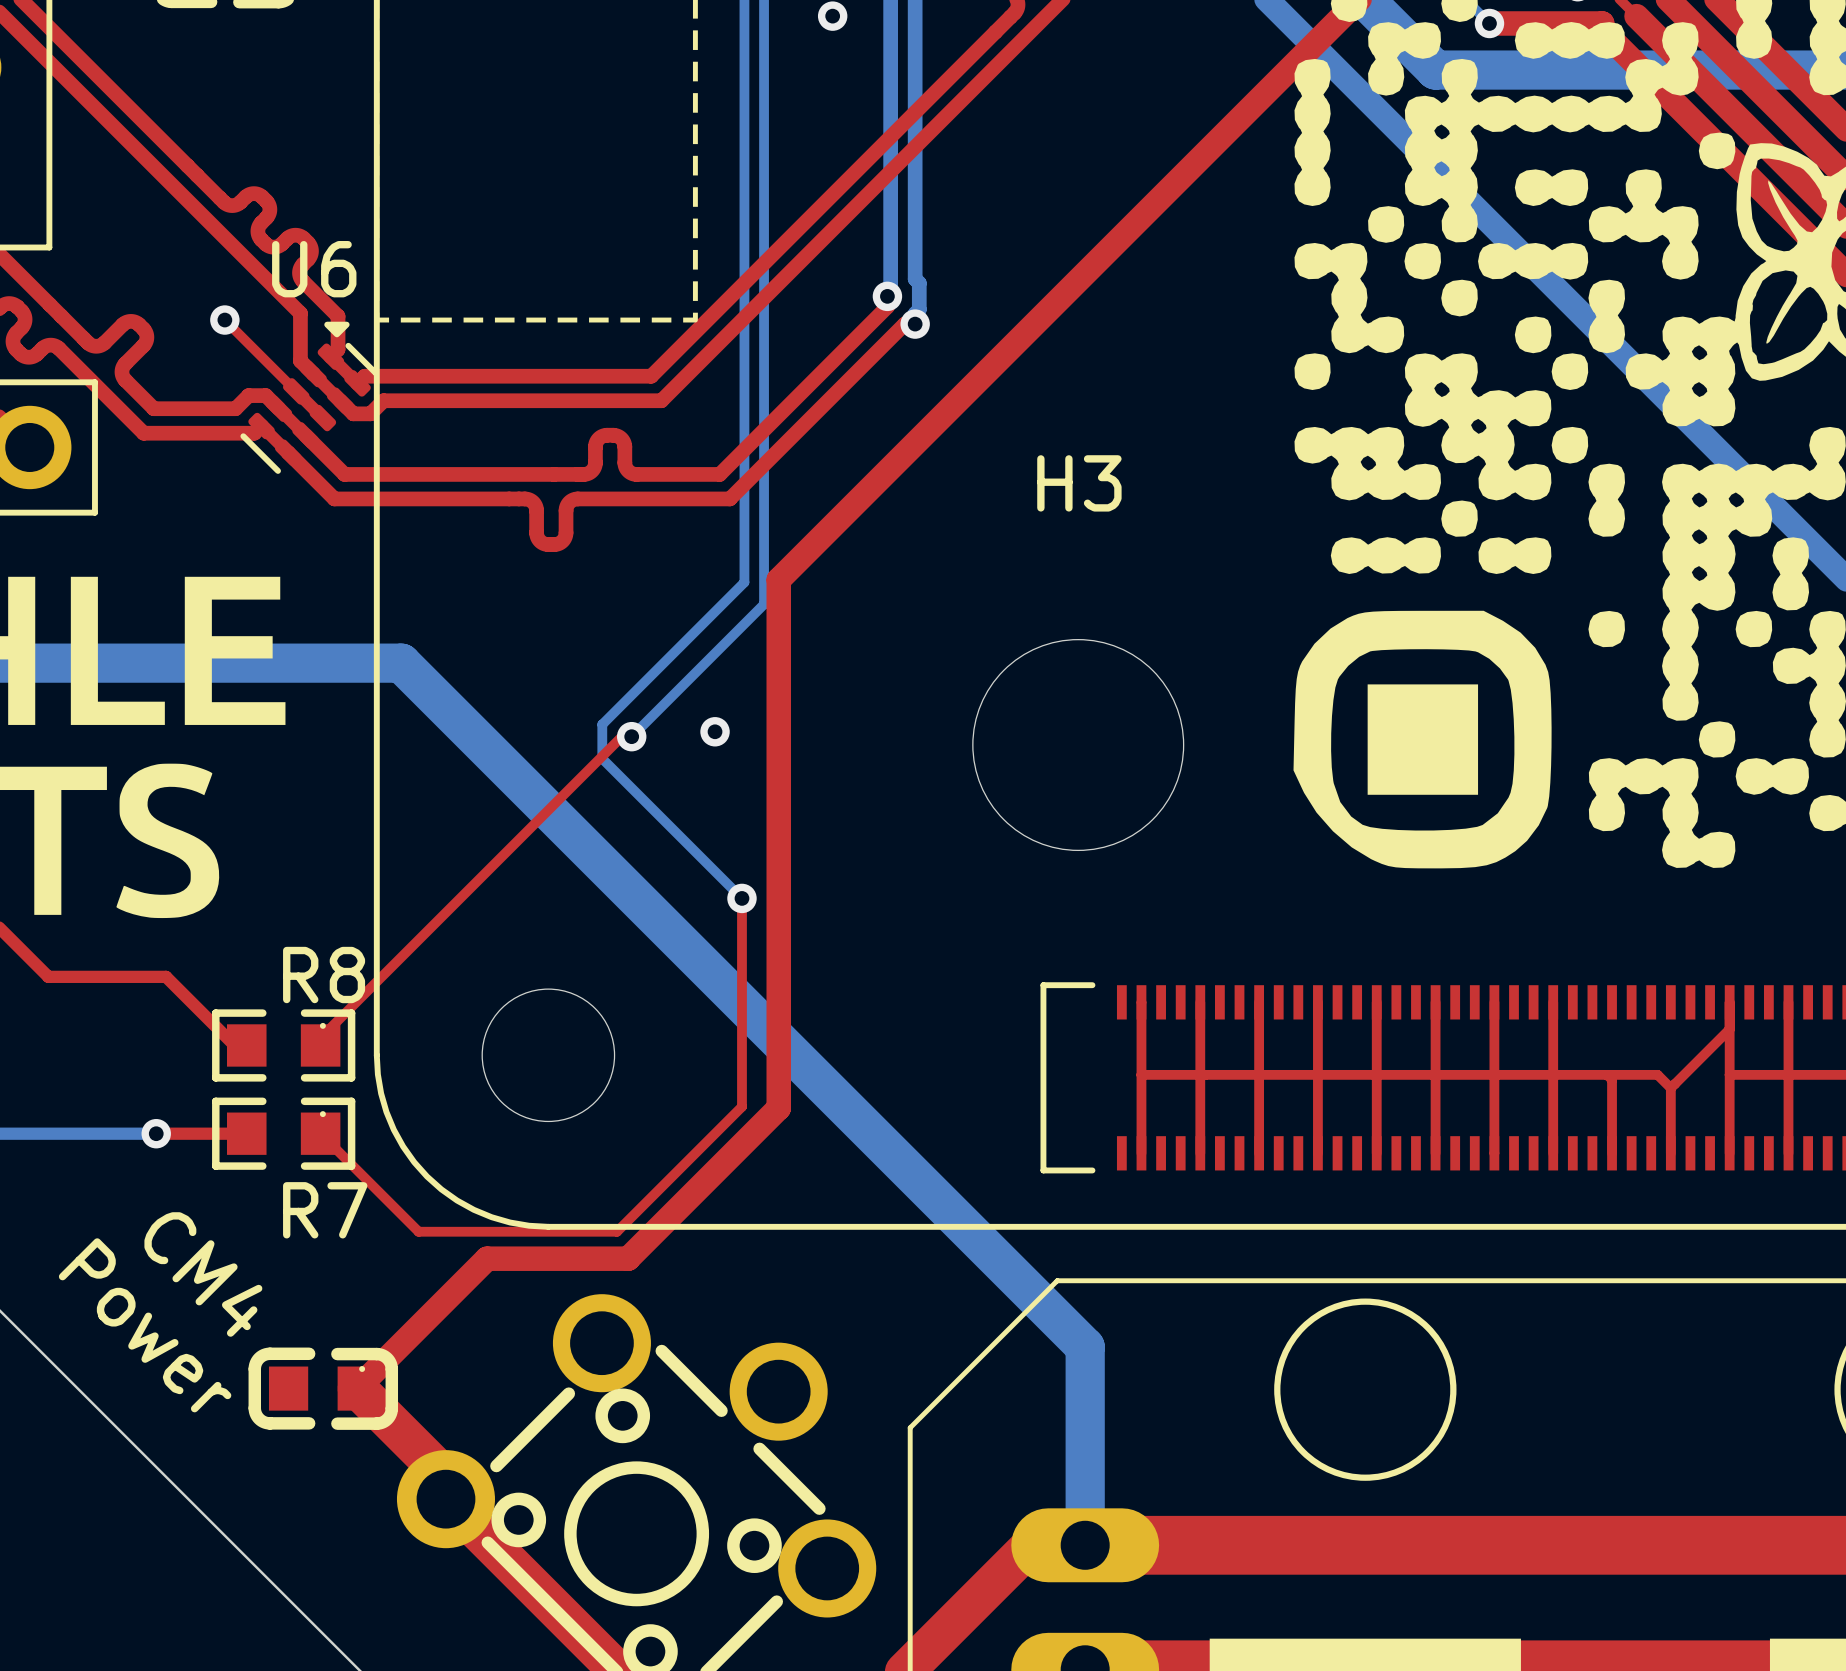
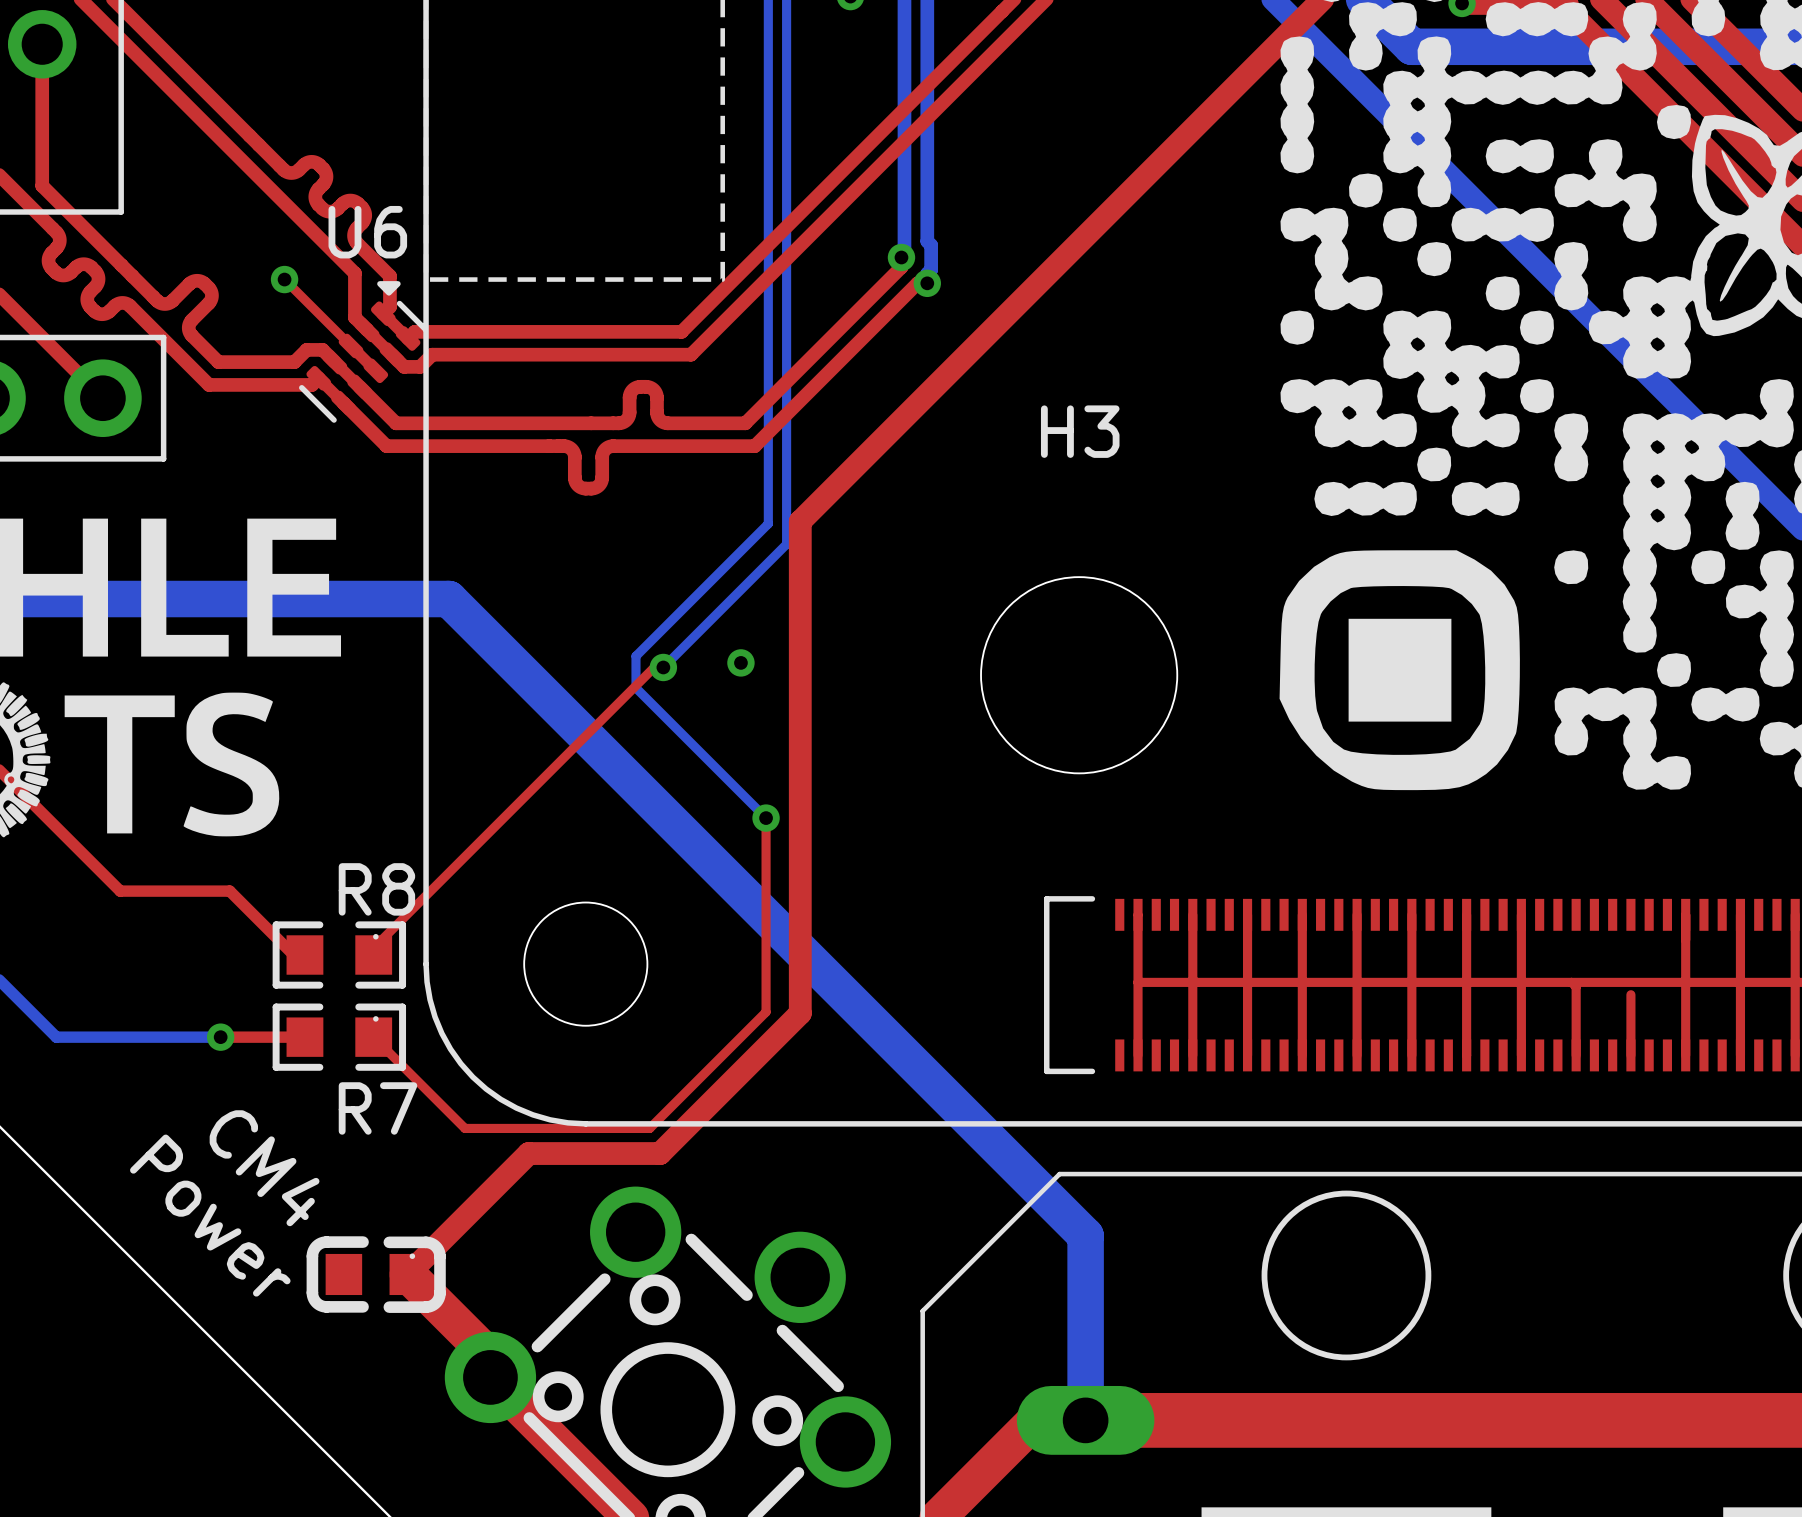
top track: (1729, 1029) (1670, 1088) (1657, 1074) -> (1685, 982) (1618, 982)

